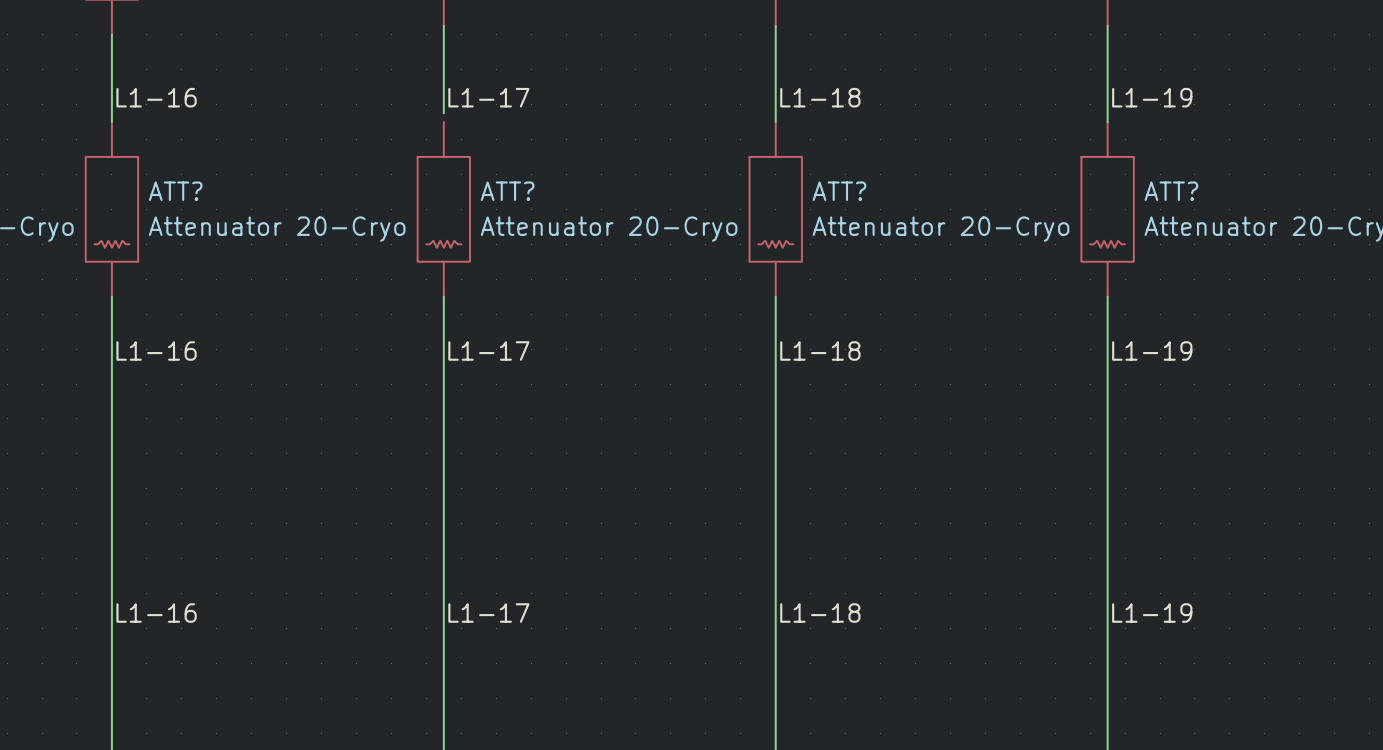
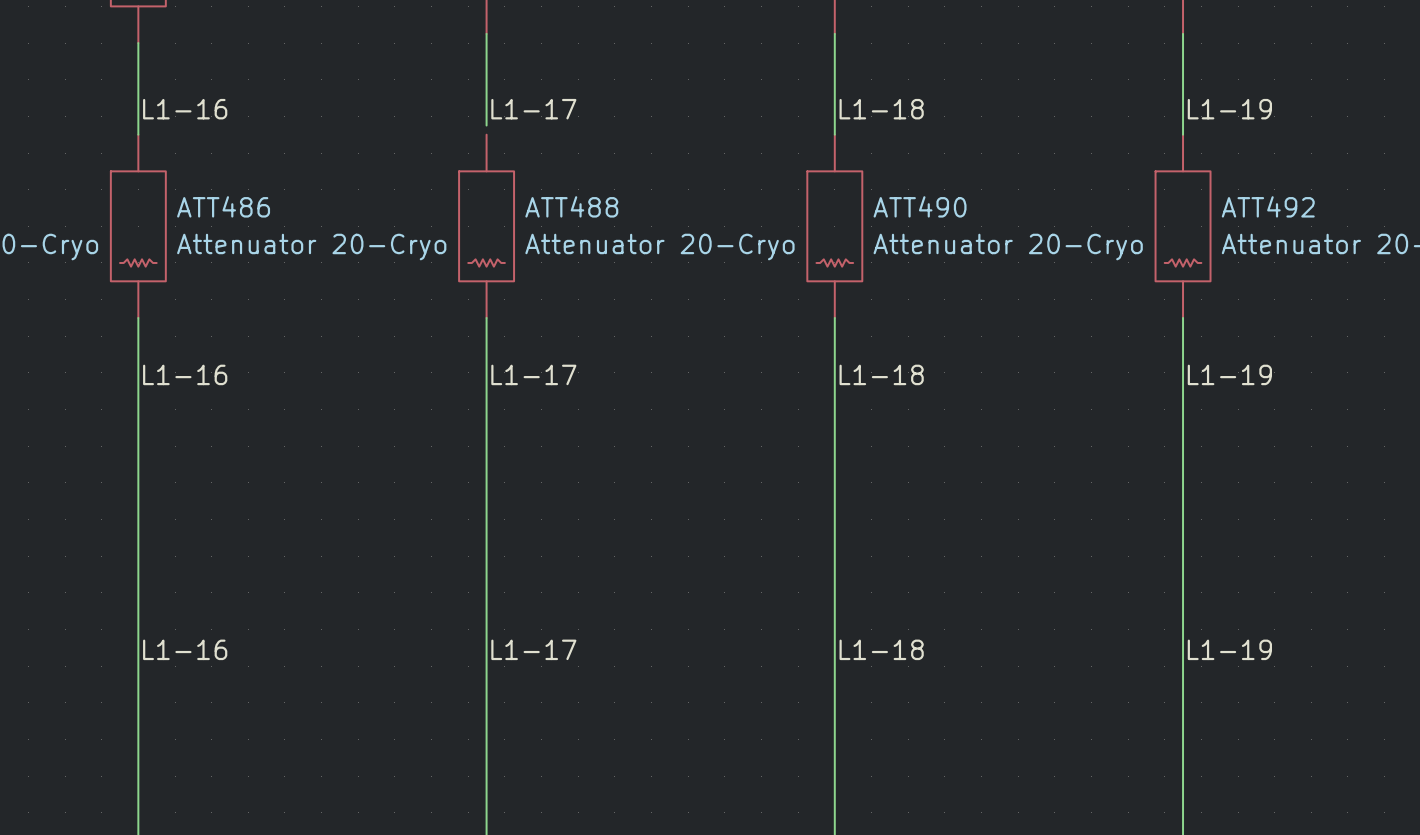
ATT? name: ATT? (175, 191) -> ATT486 (223, 206)
ATT? name: ATT? (507, 191) -> ATT488 (571, 206)
ATT? name: ATT? (839, 191) -> ATT490 (920, 206)
ATT? name: ATT? (1171, 191) -> ATT492 (1268, 206)

